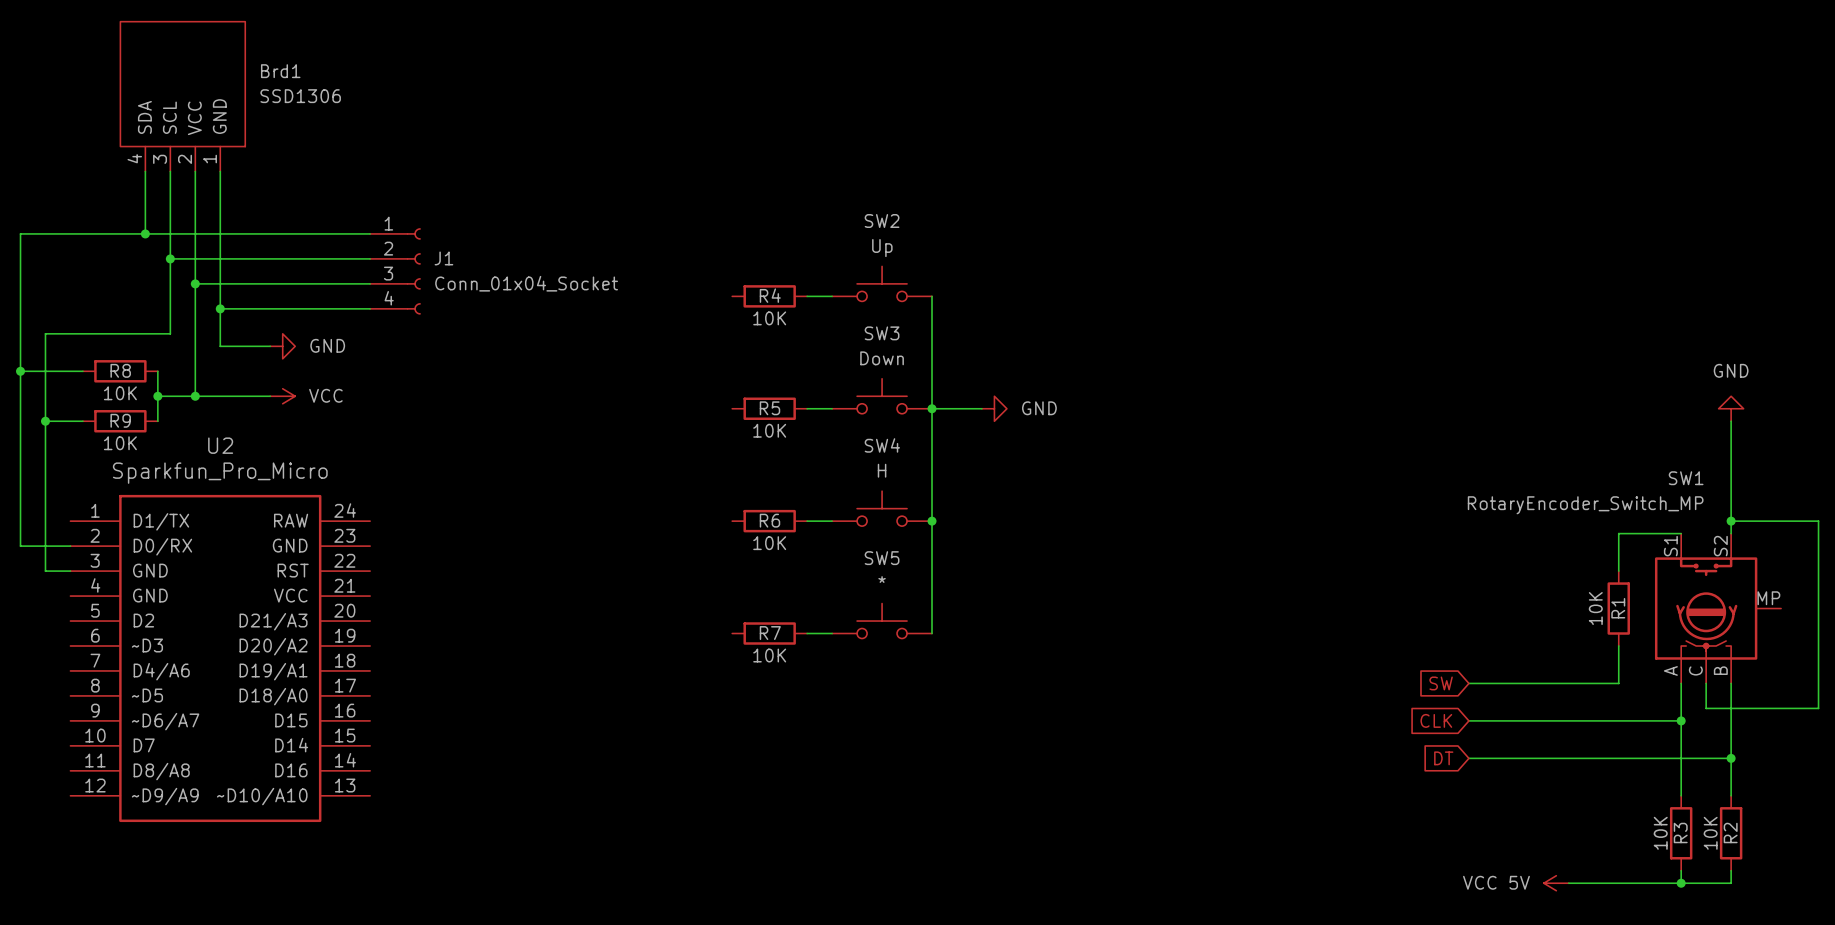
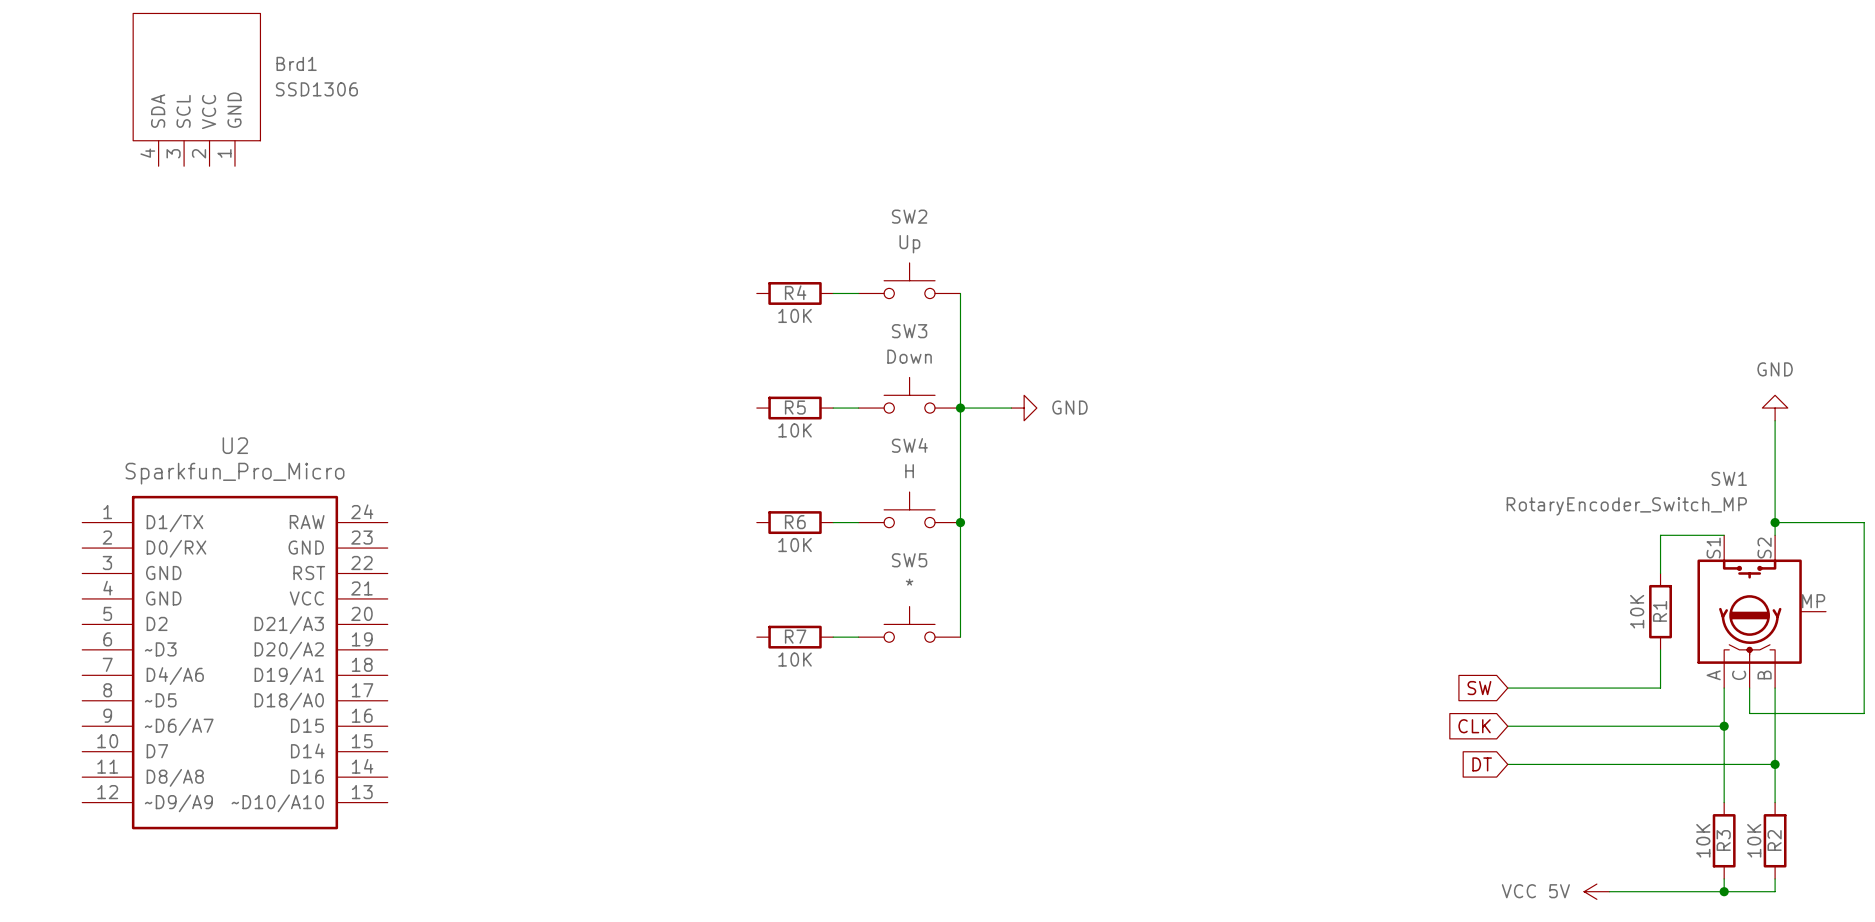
wire: (145, 171) (145, 233) -> none
wire: (170, 171) (170, 333) (45, 333) (45, 571) (70, 571) -> none
wire: (195, 171) (195, 396) -> none
wire: (220, 171) (220, 346) (270, 346) -> none
junction: (145, 233) -> none
wire: (370, 233) (20, 233) (20, 546) (70, 546) -> none
wire: (170, 258) (370, 258) -> none
junction: (170, 258) -> none
J1: Conn_01x04_Socket (395, 271) -> none
wire: (195, 283) (370, 283) -> none
junction: (195, 283) -> none
wire: (220, 308) (370, 308) -> none
junction: (220, 308) -> none
power symbol: GND (282, 346) -> none
wire: (20, 371) (82, 371) -> none
junction: (20, 371) -> none
R8: 10K (120, 371) -> none
wire: (157, 371) (157, 421) -> none
wire: (157, 396) (270, 396) -> none
junction: (157, 396) -> none
junction: (195, 396) -> none
power symbol: VCC (282, 396) -> none
wire: (45, 421) (82, 421) -> none
junction: (45, 421) -> none
R9: 10K (120, 421) -> none

